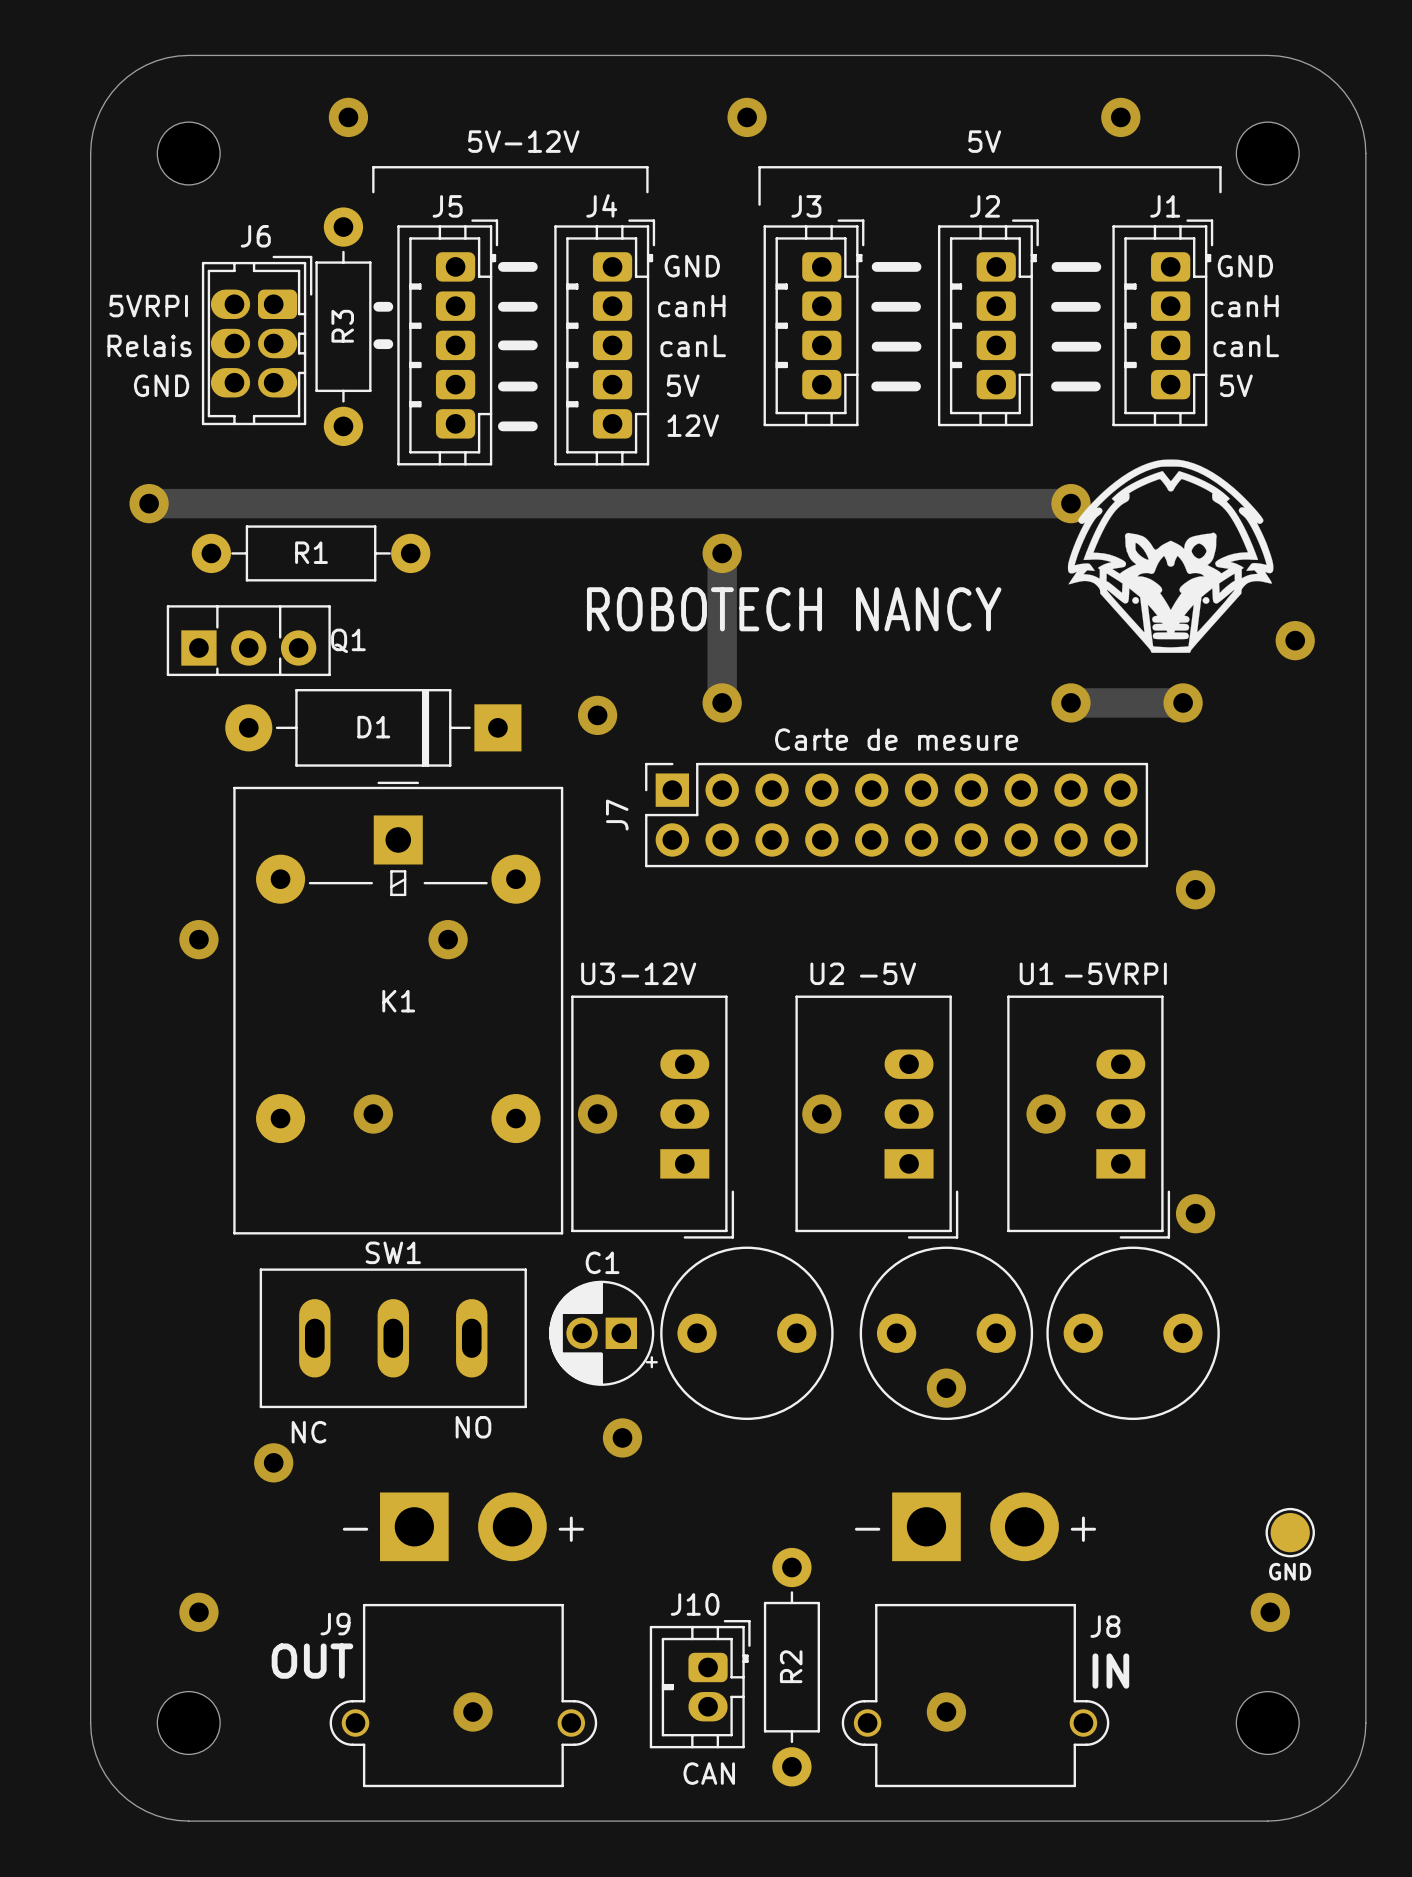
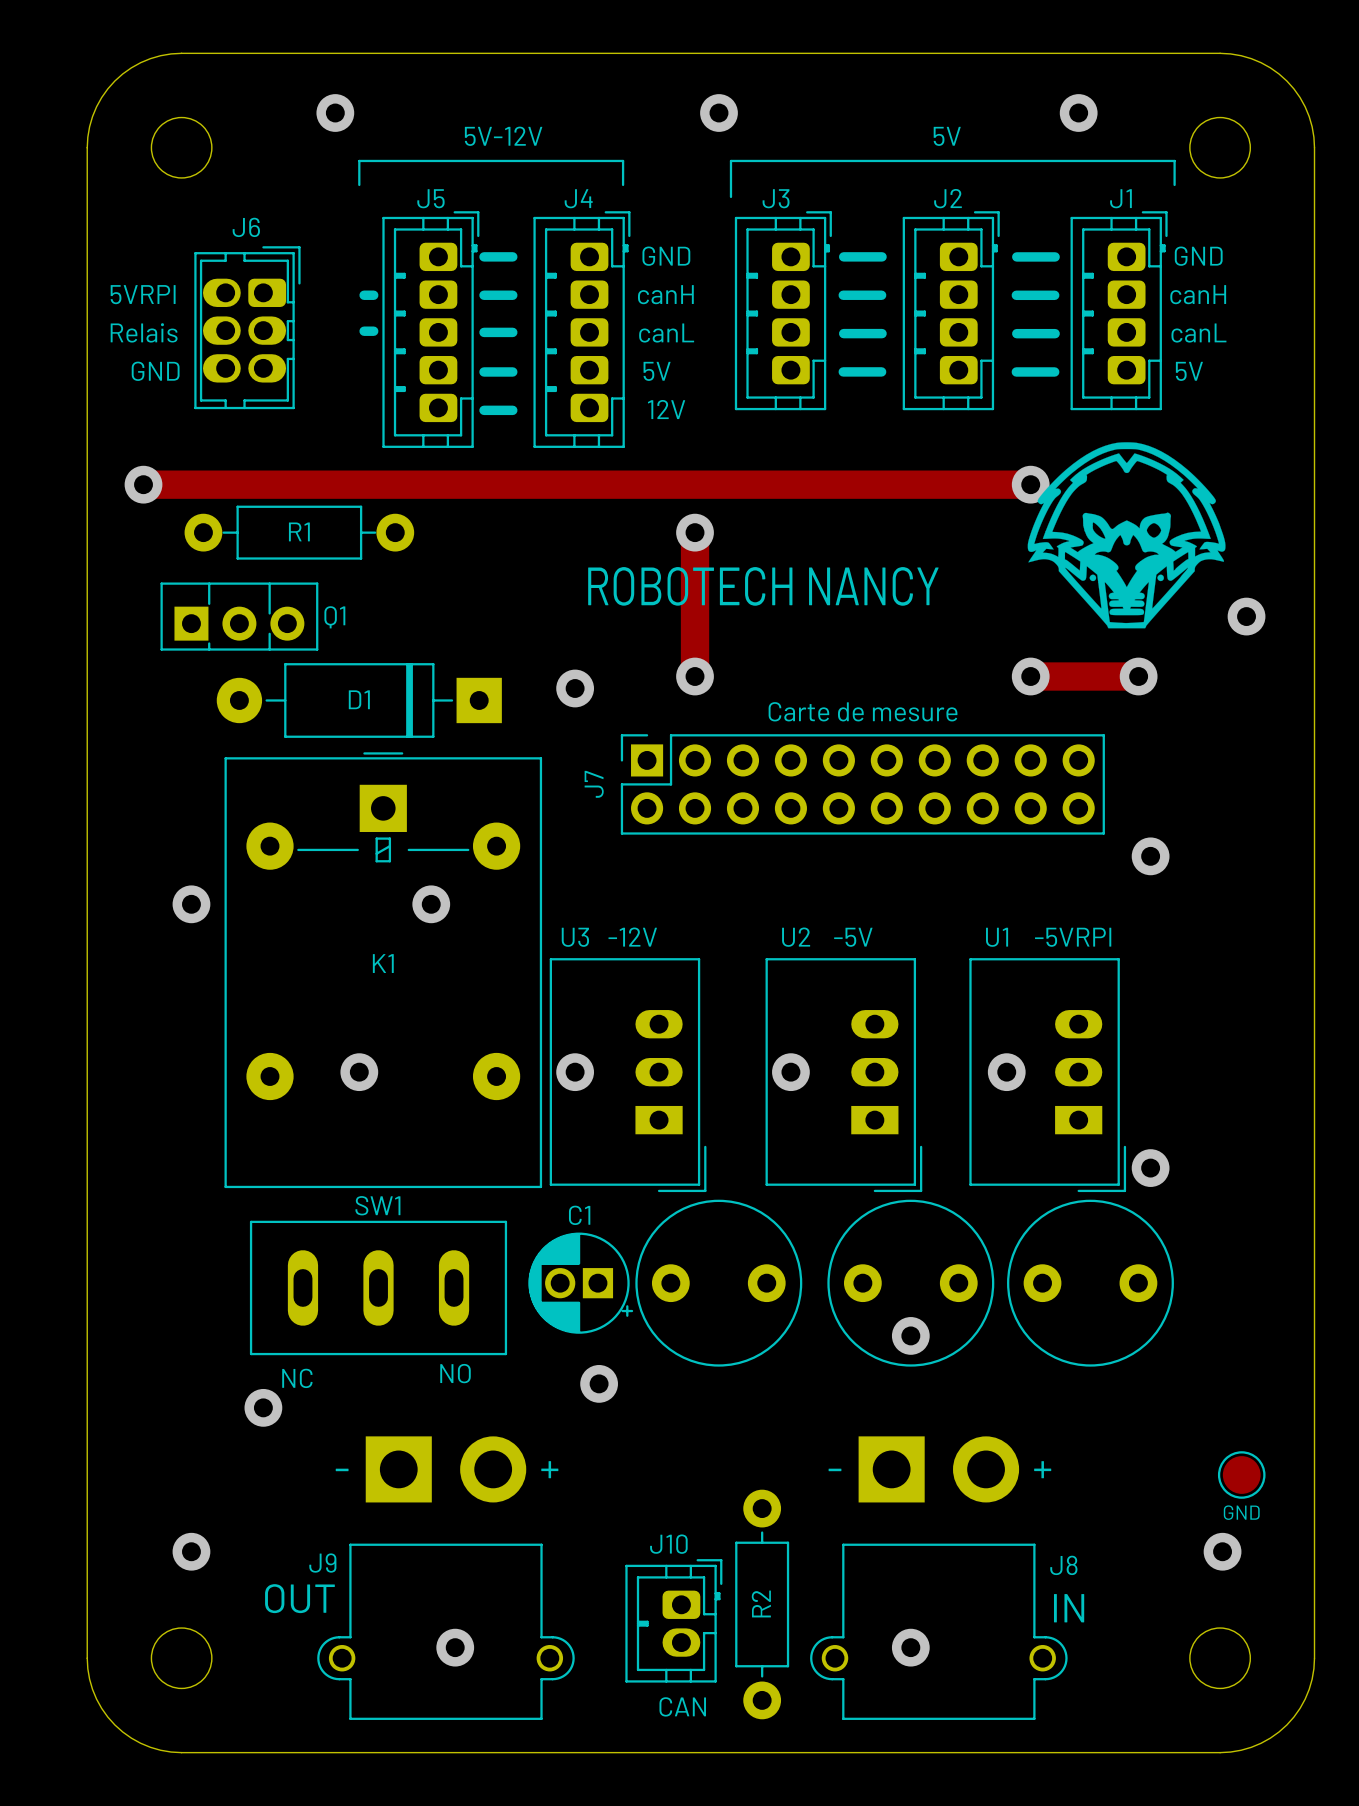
R3: (343, 326) -> none

